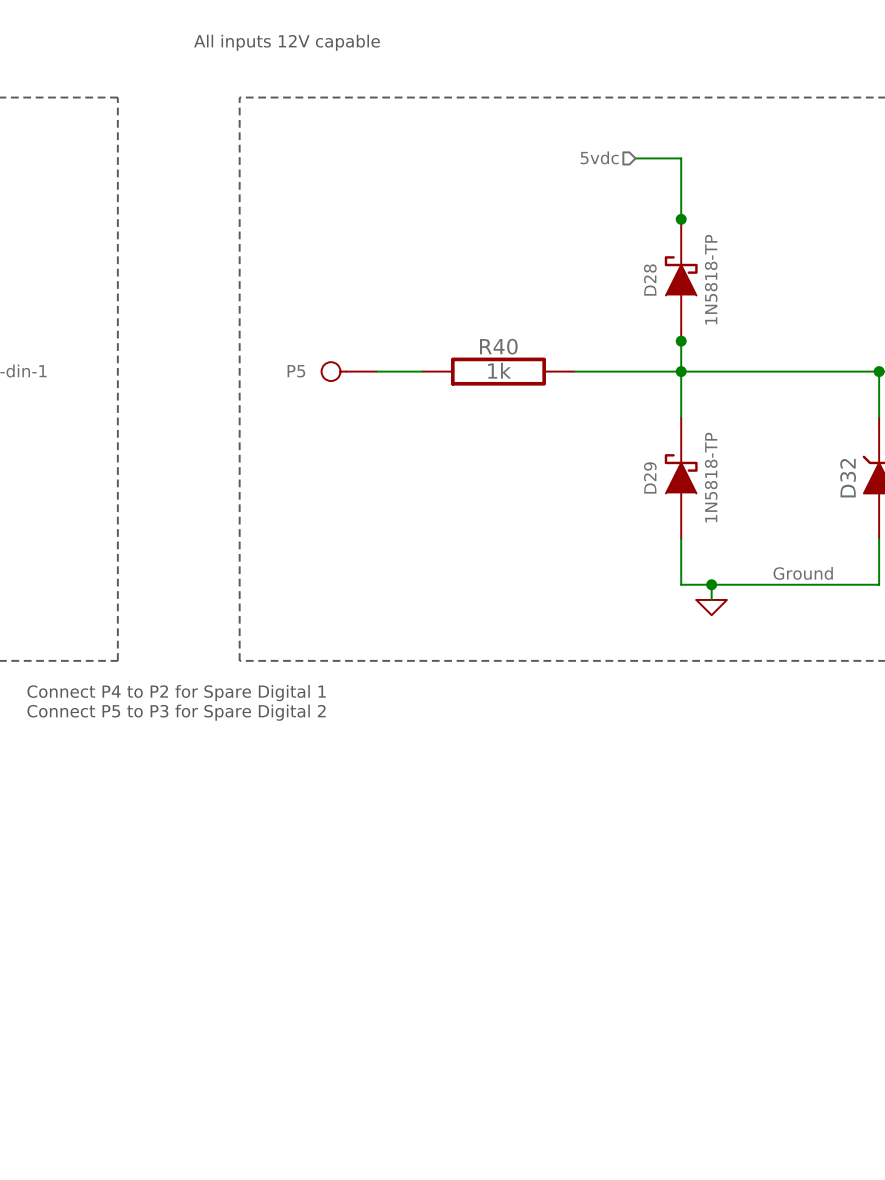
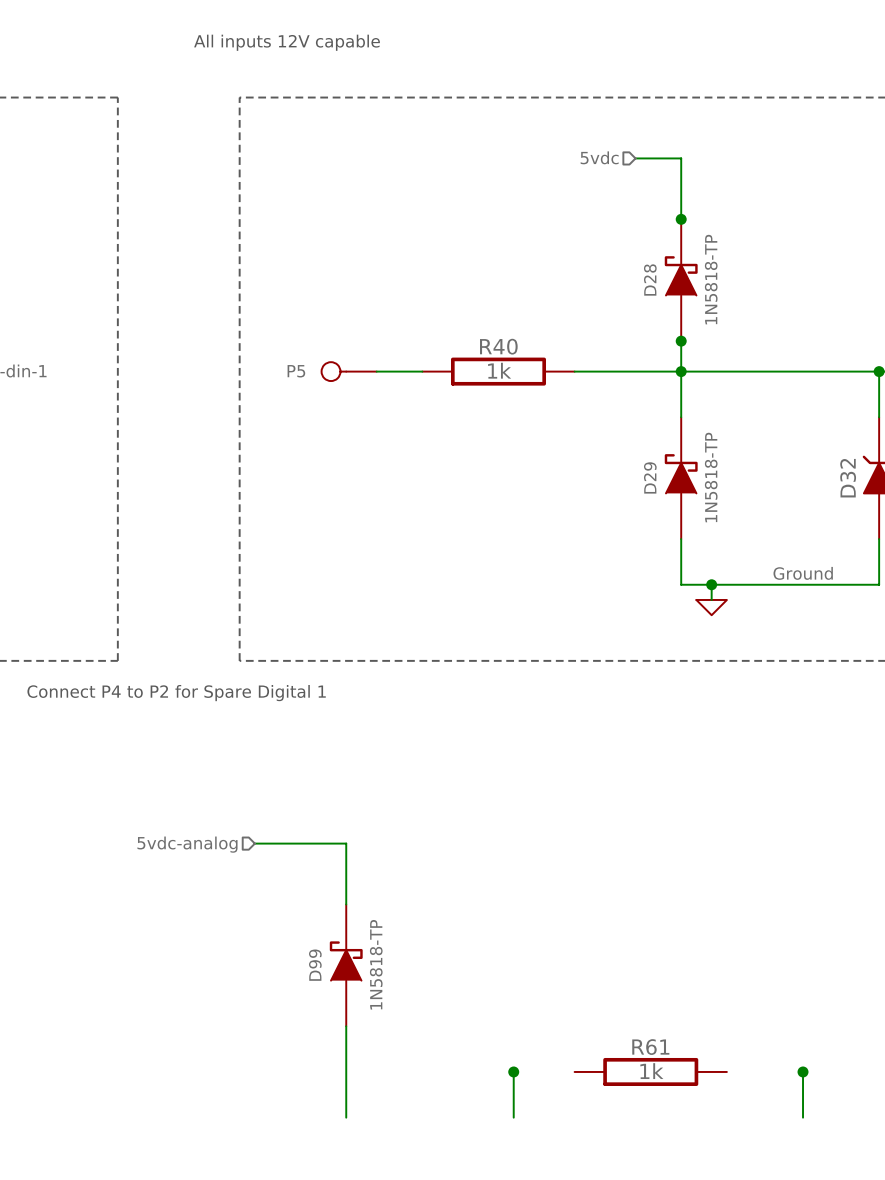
text: Connect P5 to P3 for Spare Digital 2 (176, 712) -> none
wire: none -> (254, 843) (346, 843) (346, 904)
hierarchical label: none -> 5vdc-analog (187, 844)
D99: none -> 1N5818-TP (346, 965)
wire: none -> (346, 1026) (346, 1117)
wire: none -> (513, 1071) (513, 1117)
junction: none -> (513, 1071)
R61: none -> 1k (650, 1071)
wire: none -> (803, 1071) (803, 1117)
junction: none -> (803, 1071)

